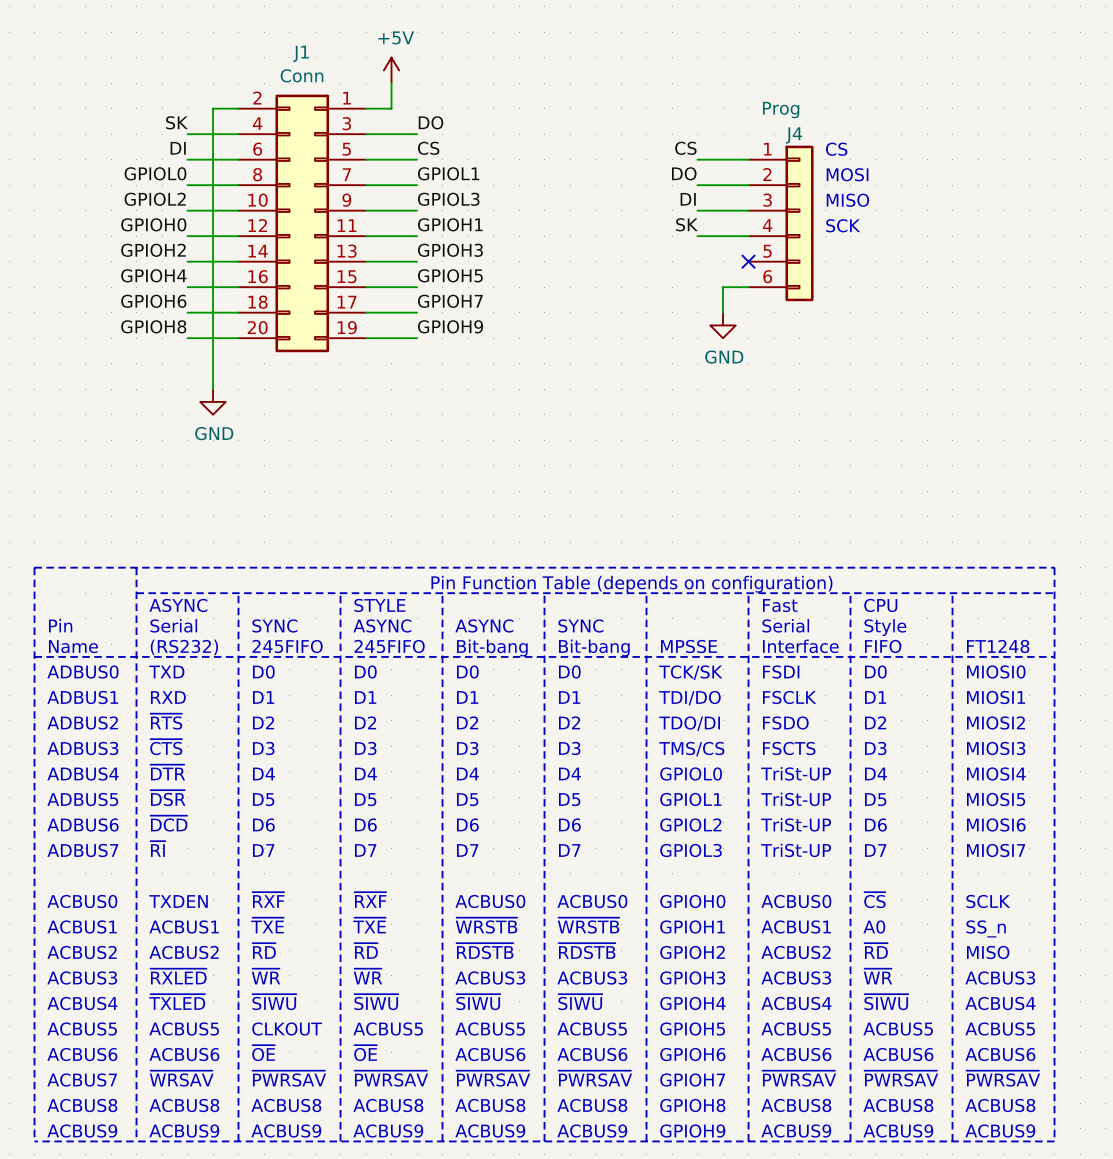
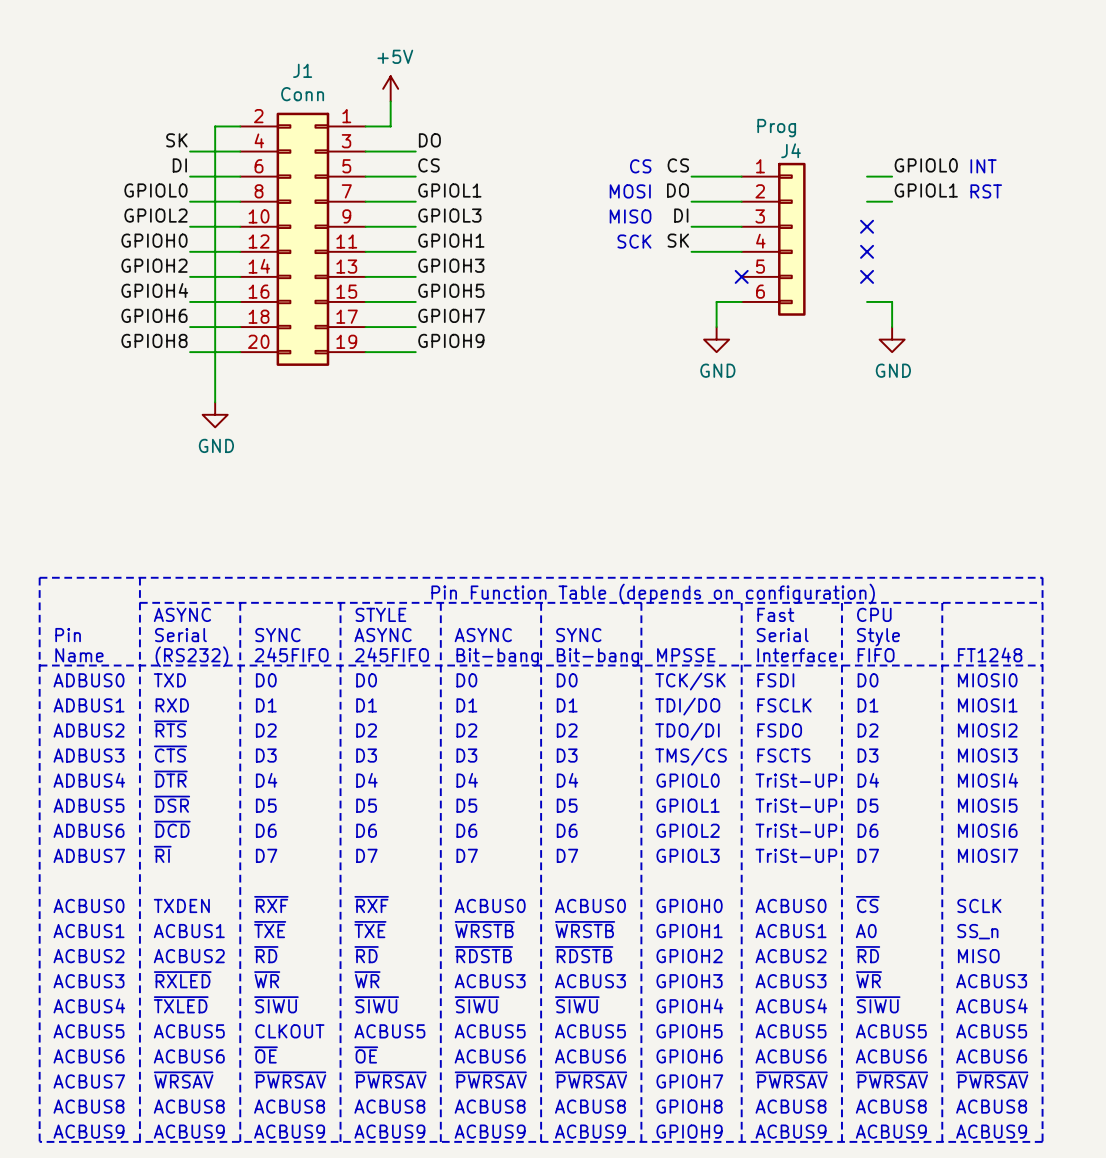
label: none -> GPIOL0 (926, 165)
text position: CS (836, 149) -> CS (640, 166)
text: none -> INT (983, 166)
wire: none -> (867, 176) (892, 176)
label: none -> GPIOL1 (926, 190)
text position: MOSI (847, 174) -> MOSI (630, 191)
text: none -> RST (986, 191)
wire: none -> (867, 201) (892, 201)
text position: MISO (847, 200) -> MISO (630, 216)
no-connect mark: none -> (867, 226)
text position: SCK (843, 225) -> SCK (634, 241)
no-connect mark: none -> (867, 251)
no-connect mark: none -> (867, 276)
wire: none -> (867, 301) (892, 301) (892, 327)
power symbol: none -> GND (892, 339)

